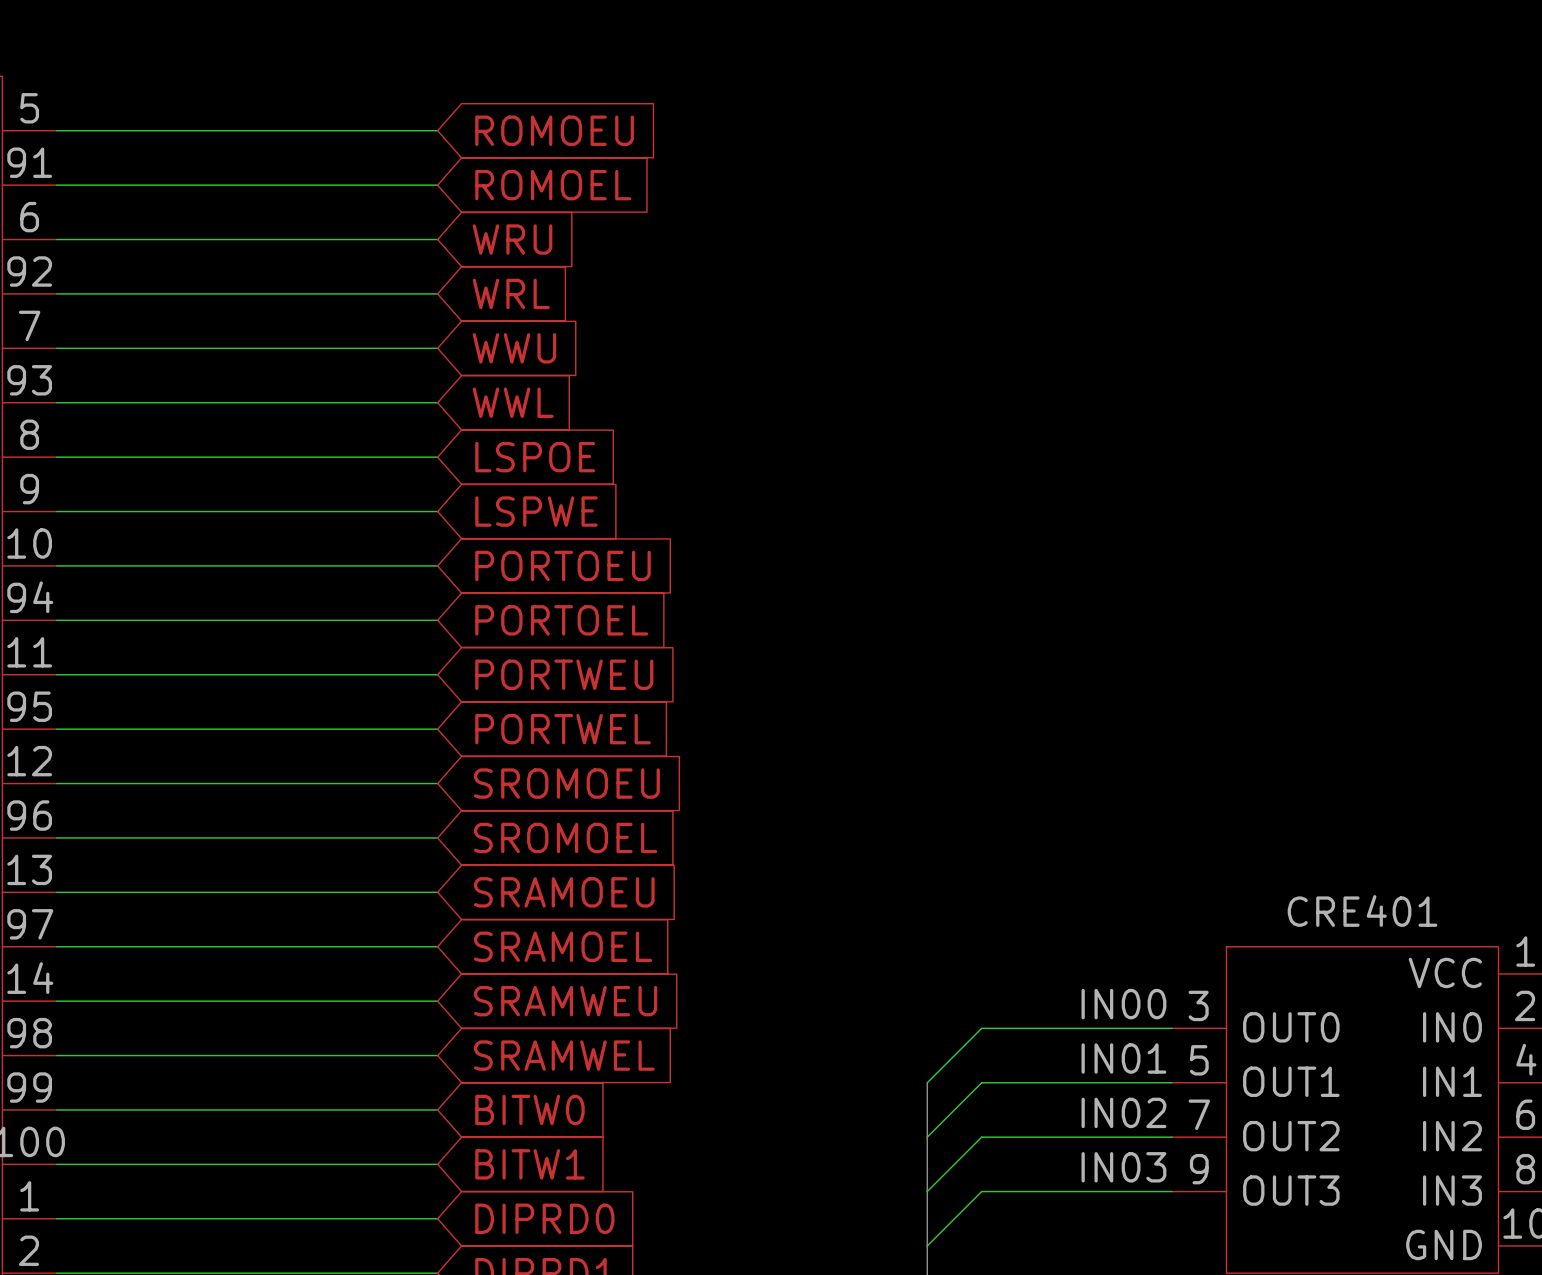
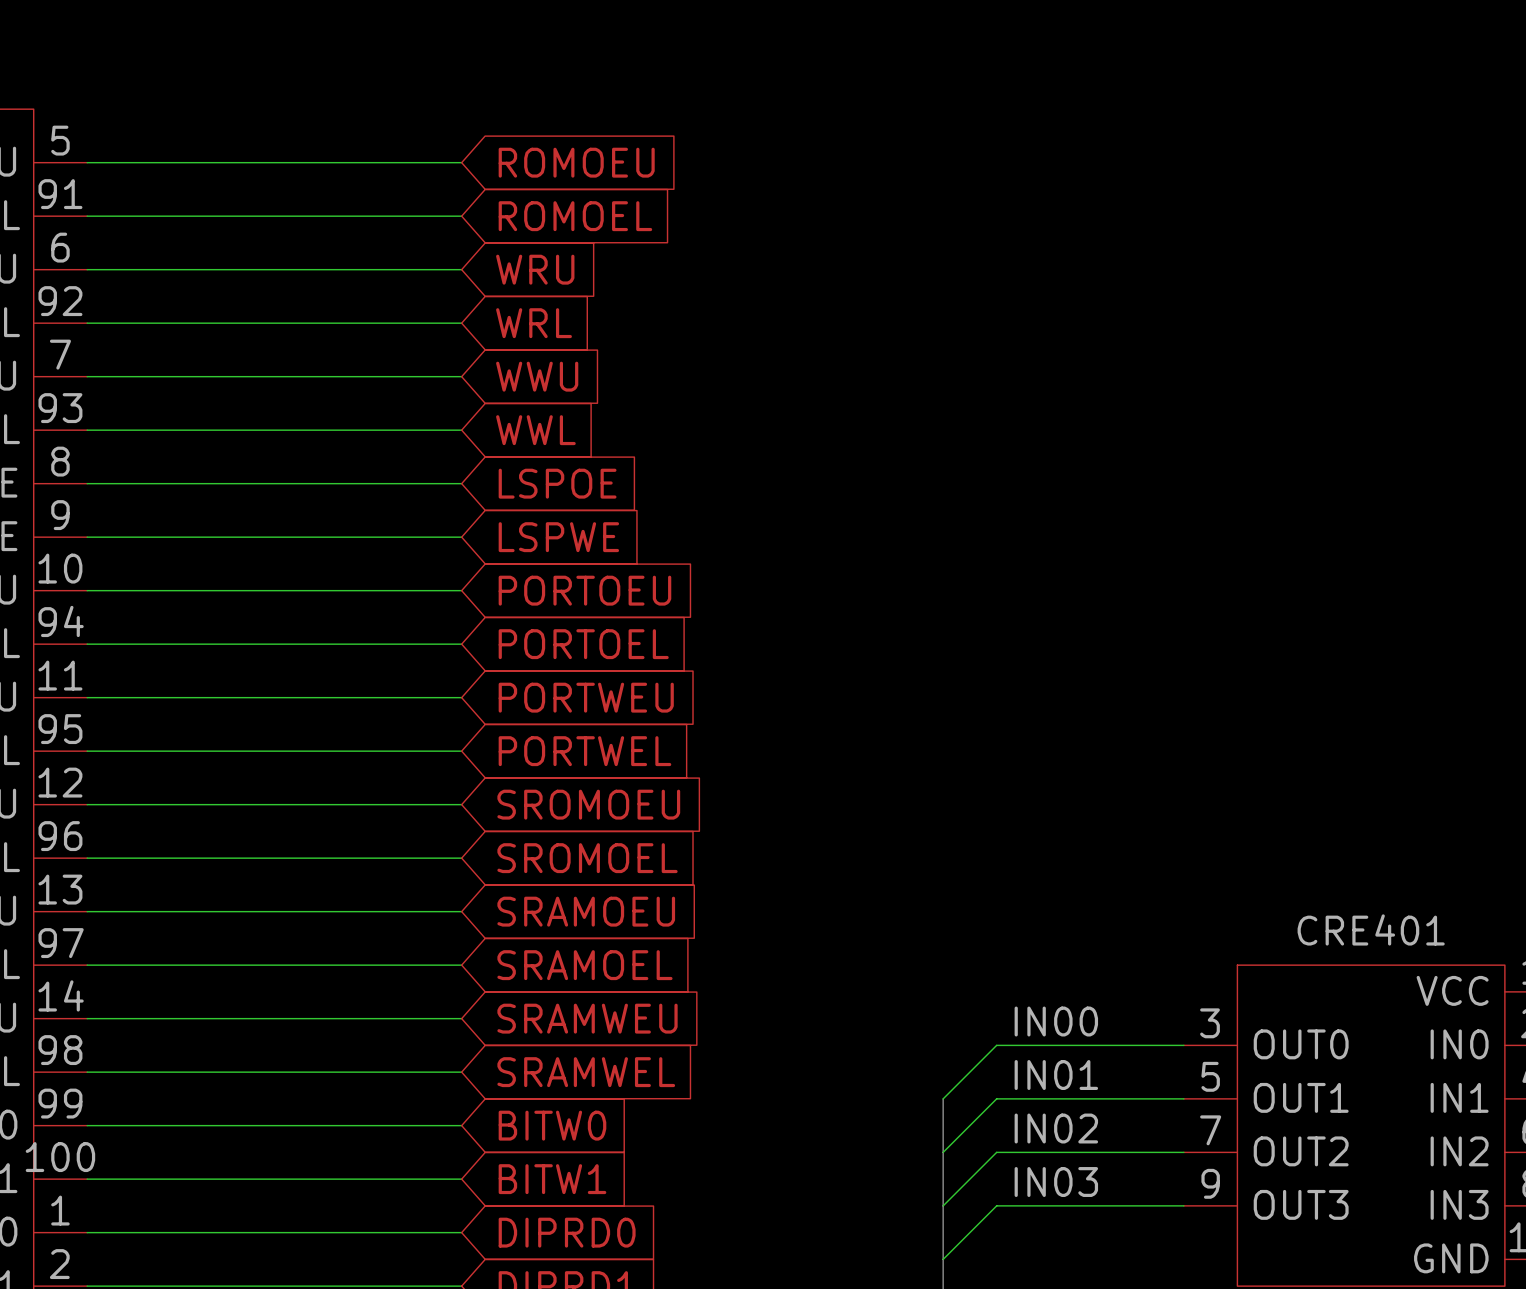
label position: IN00 (1123, 1004) -> IN00 (1056, 1021)
label position: IN01 (1123, 1058) -> IN01 (1056, 1075)
label position: IN02 (1123, 1112) -> IN02 (1056, 1128)
label position: IN03 (1123, 1167) -> IN03 (1056, 1182)

